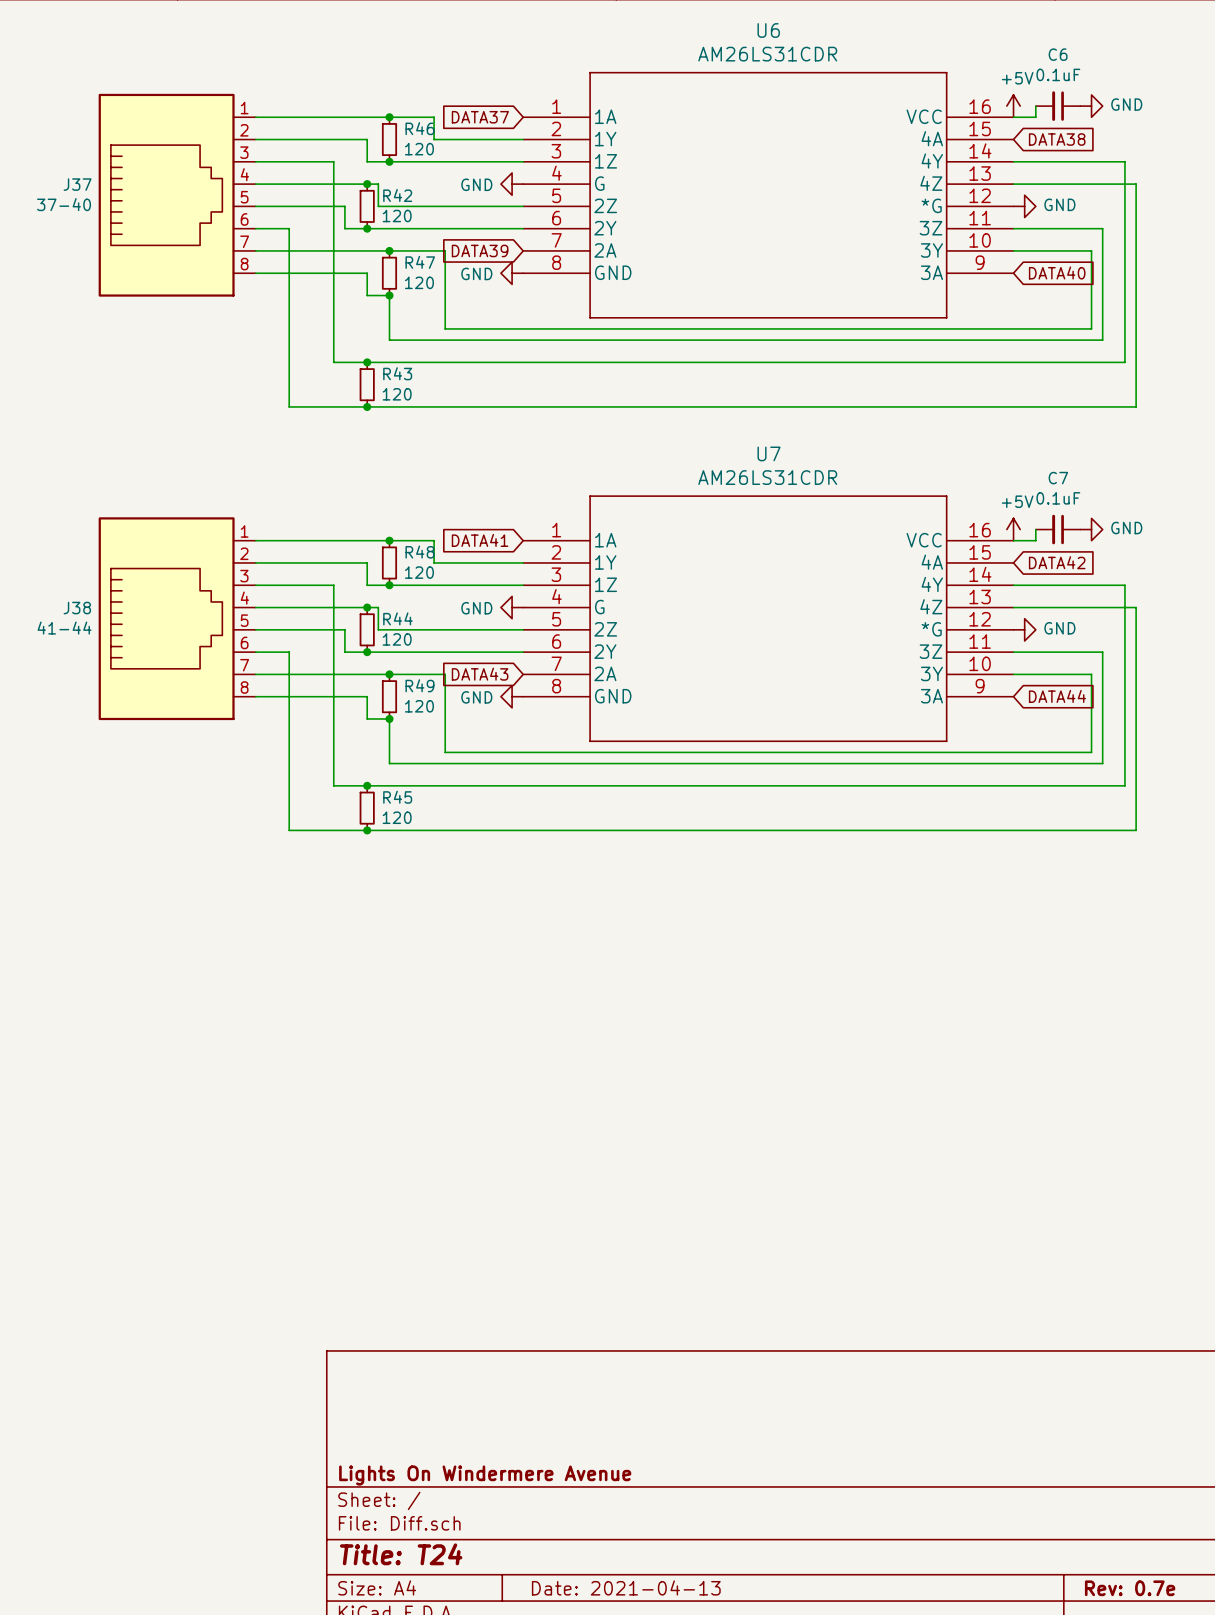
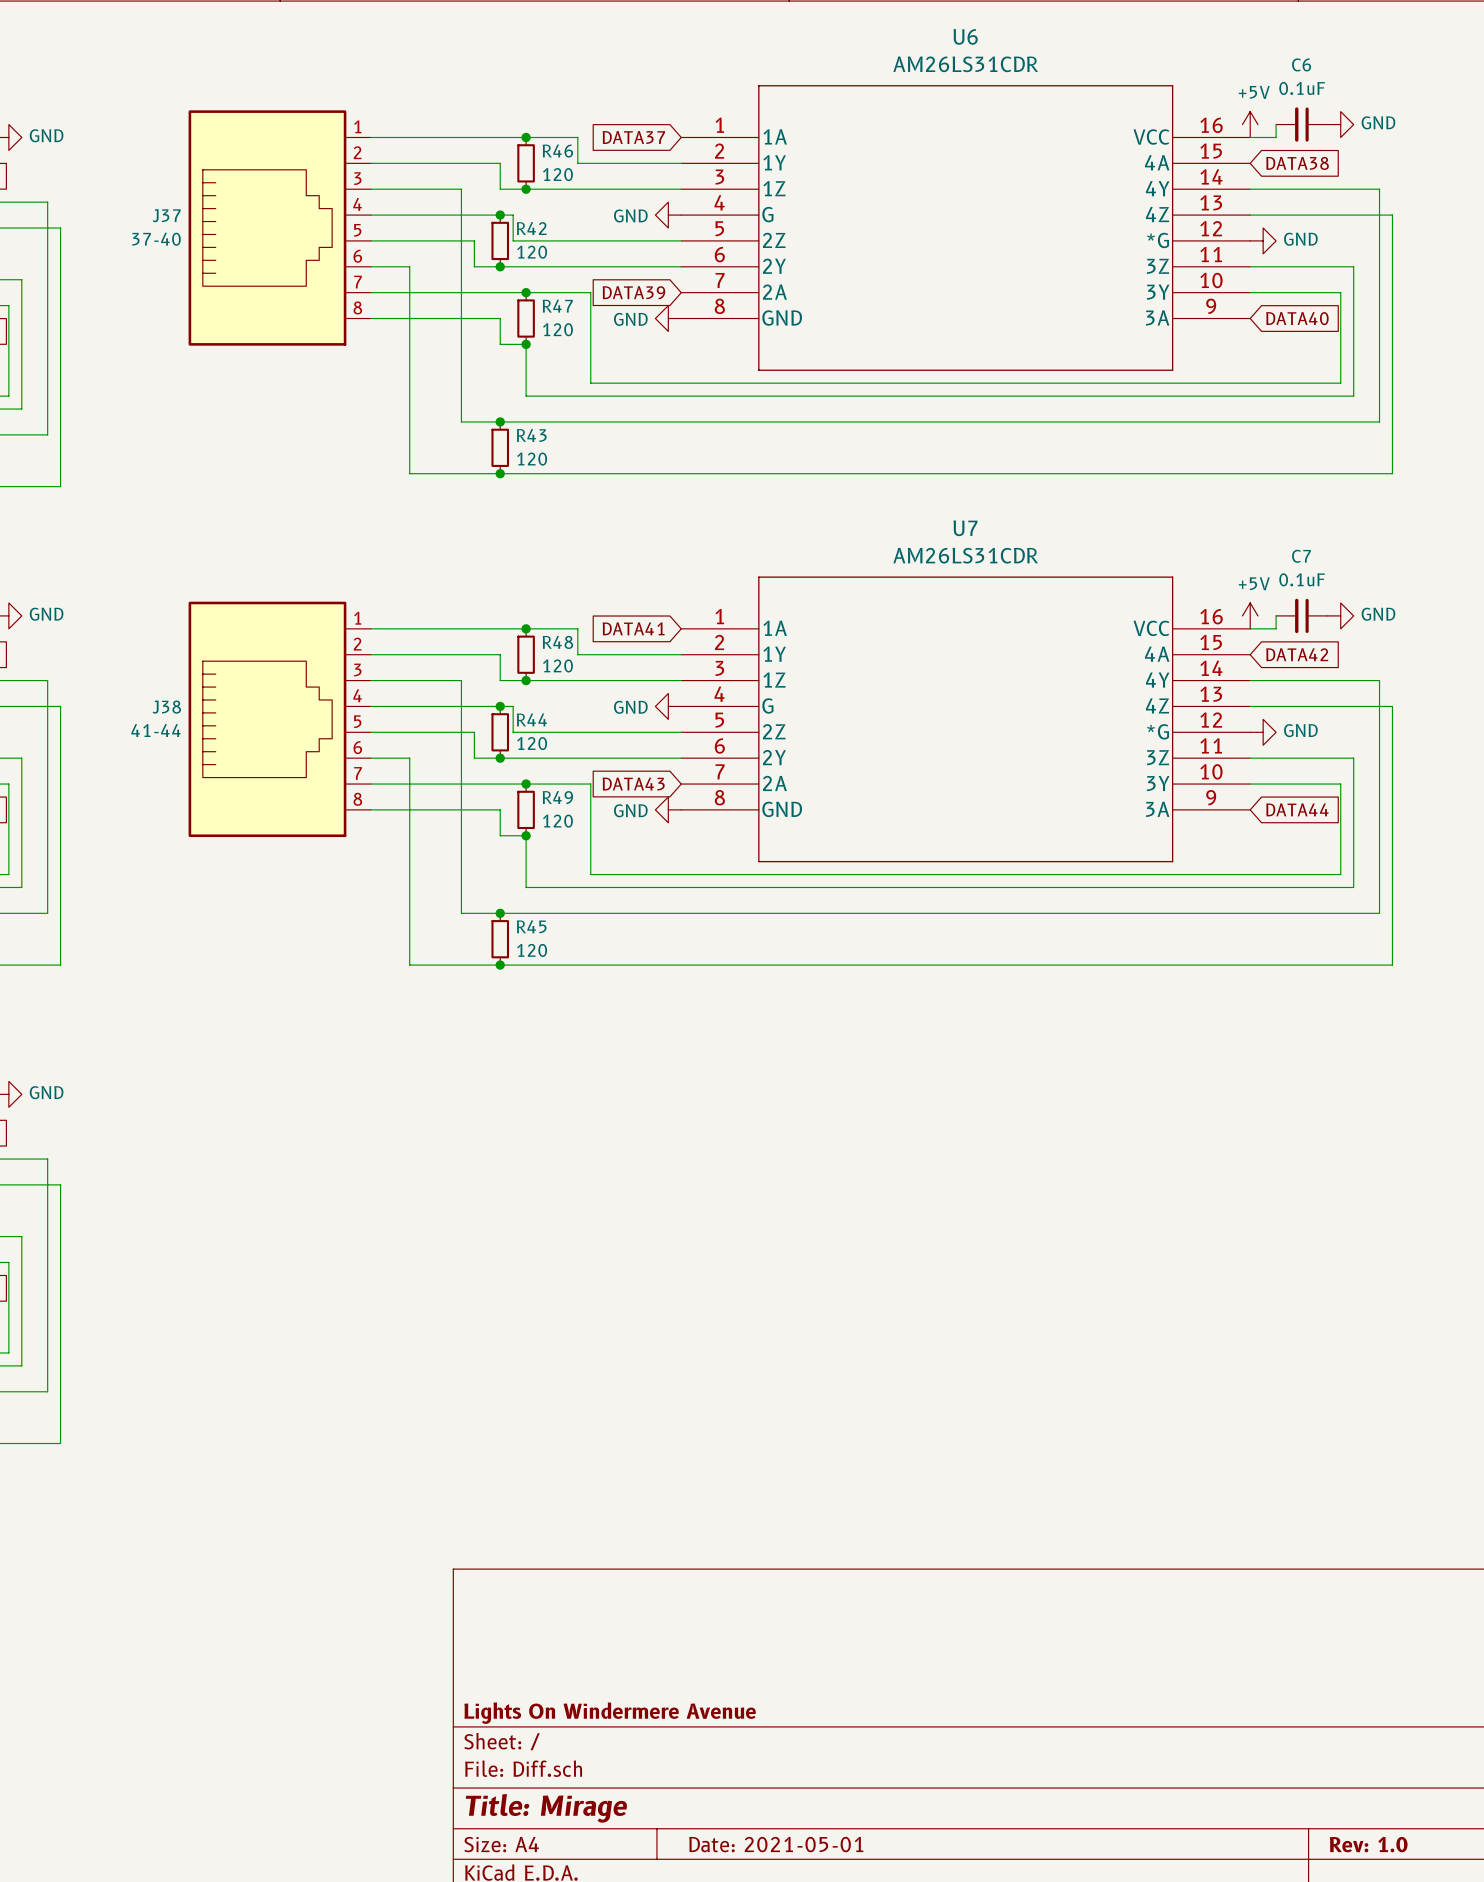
title block: Title: T24 (401, 1554) -> Title: Mirage (546, 1808)
title block: Date: 2021-04-13 (626, 1587) -> Date: 2021-05-01 (776, 1844)
title block: Rev: 0.7e (1130, 1588) -> Rev: 1.0 (1368, 1844)

